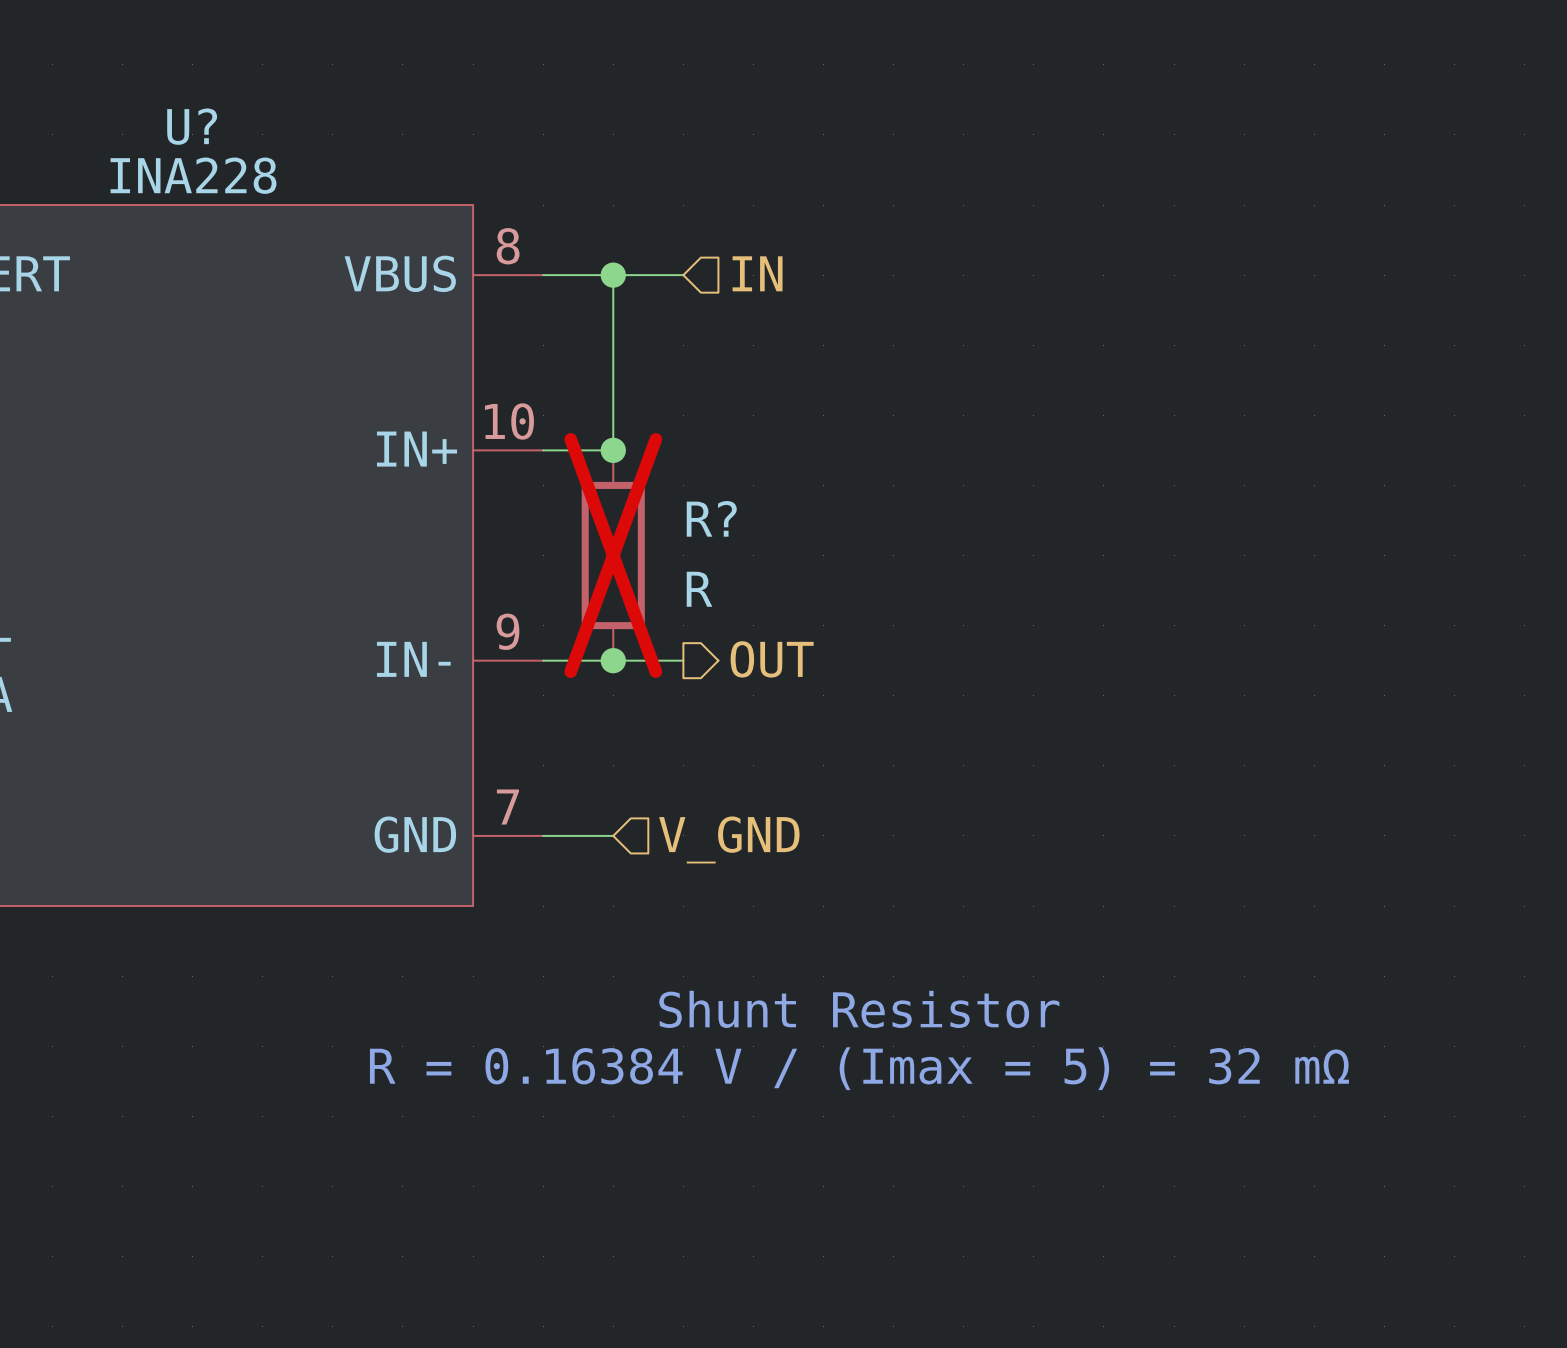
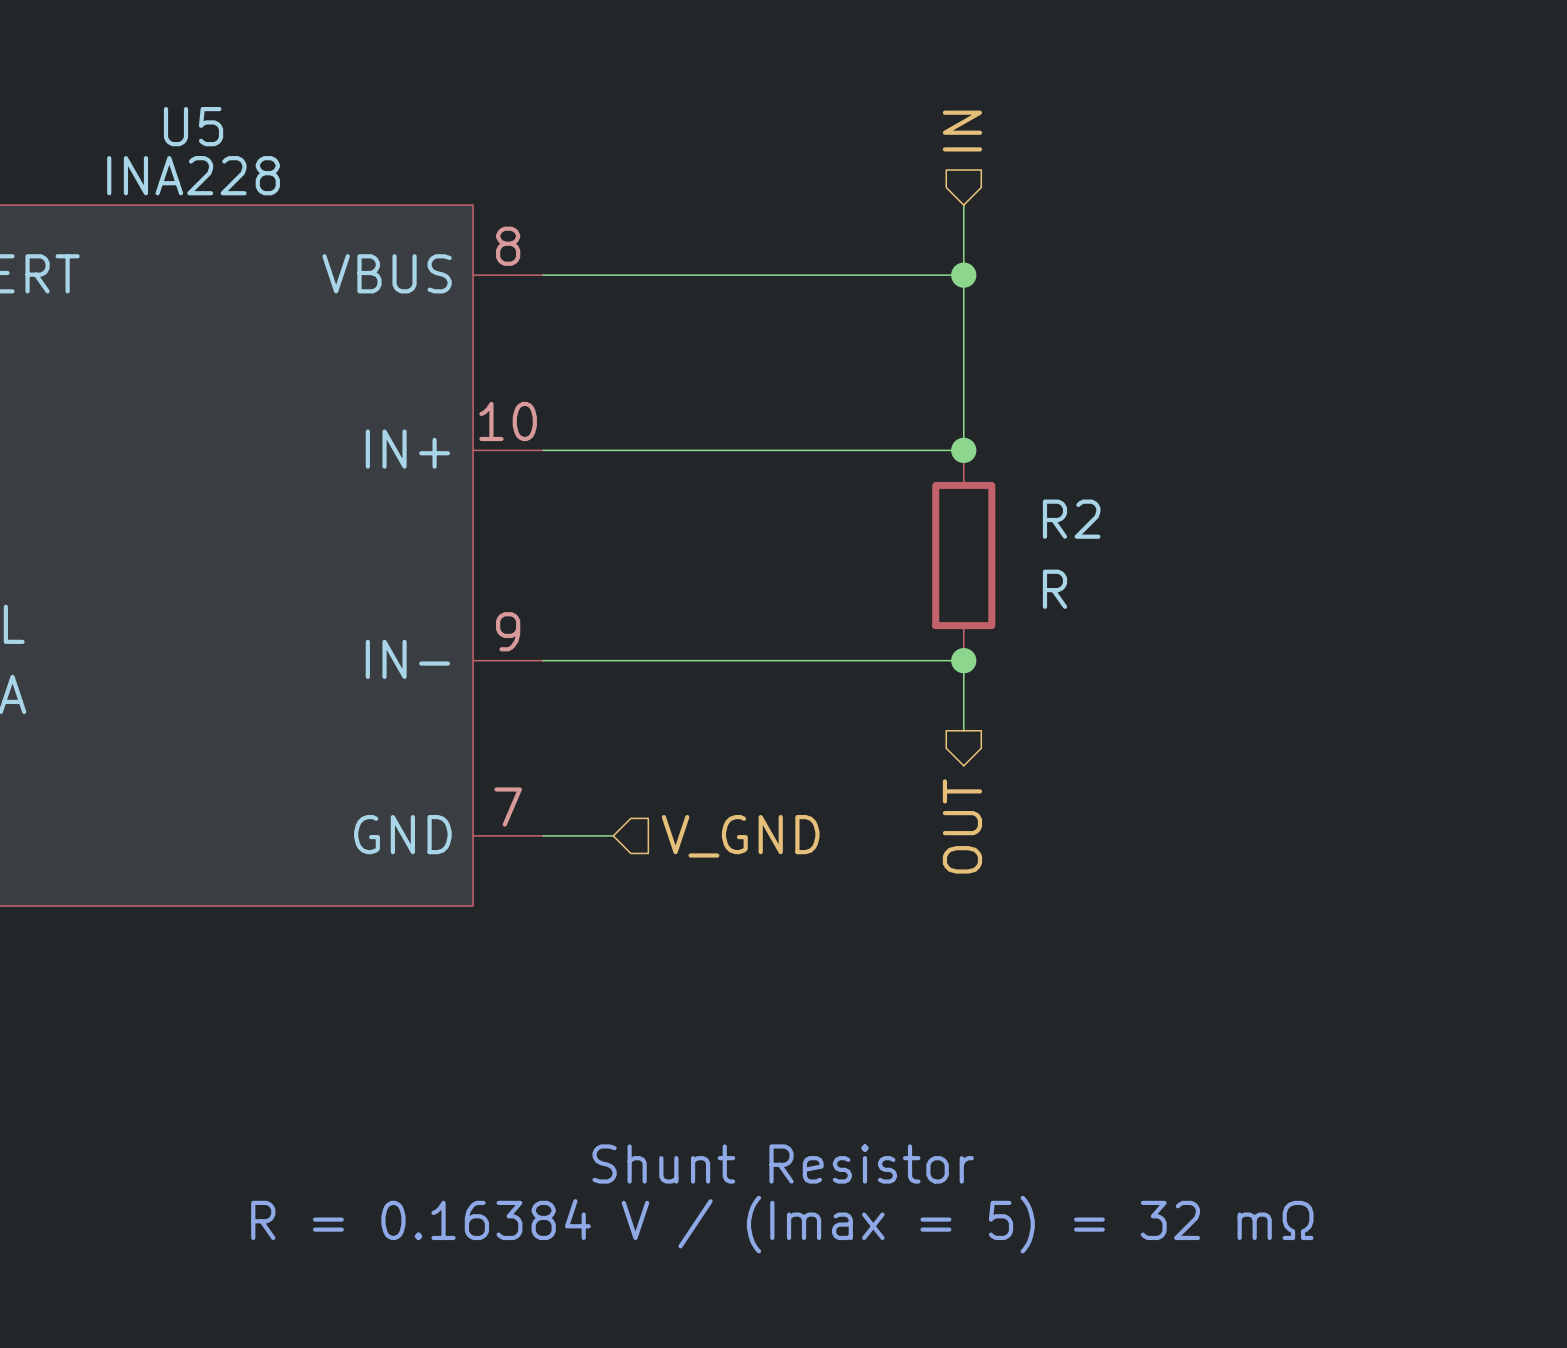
U? name: U? (192, 126) -> U5 (193, 126)
hierarchical label rotation: 0° (757, 273) -> 90° counterclockwise (962, 131)
hierarchical label position: IN (757, 273) -> IN (962, 131)
wire: (613, 275) (613, 450) -> (963, 205) (963, 450) (613, 450)
junction: (613, 275) -> none
wire: none -> (683, 275) (963, 275)
junction: none -> (963, 275)
junction: (613, 450) -> none
junction: none -> (963, 450)
R?: R (613, 555) -> none
R2: none -> R (963, 555)
hierarchical label rotation: 0° (772, 659) -> 90° clockwise (962, 826)
hierarchical label position: OUT (772, 659) -> OUT (962, 826)
junction: (613, 660) -> none
wire: none -> (683, 660) (963, 660) (963, 730)
junction: none -> (963, 660)
text position: Shunt Resistor (859, 1009) -> Shunt Resistor (783, 1164)
text position: R = 0.16384 V / (Imax = 5) = 32 mΩ (859, 1068) -> R = 0.16384 V / (Imax = 5) = 32 mΩ (782, 1224)

